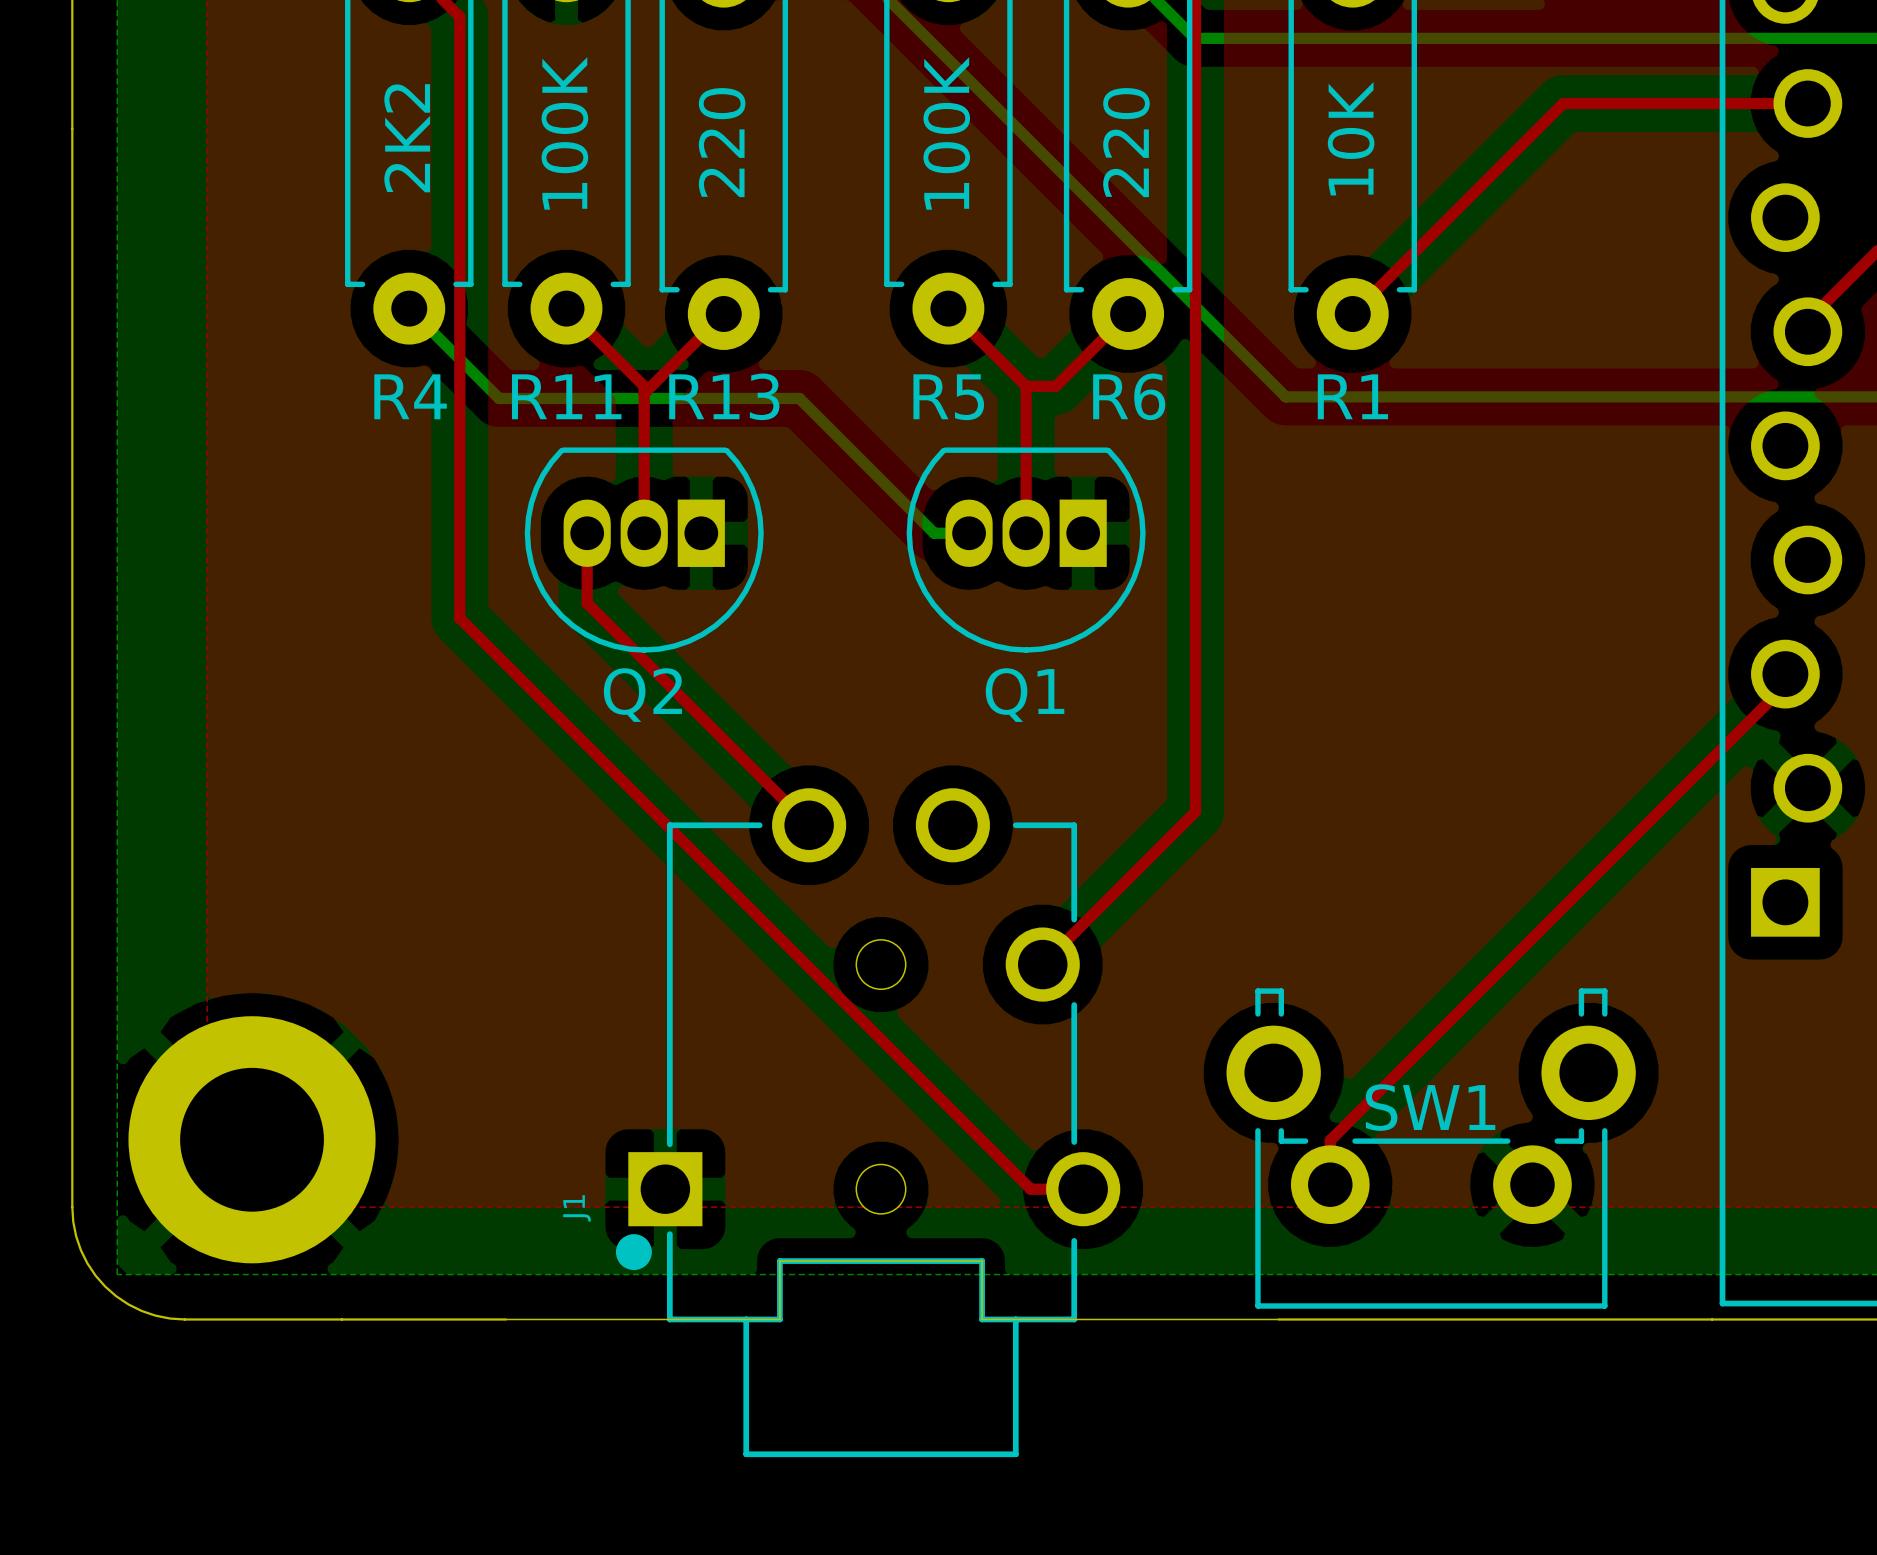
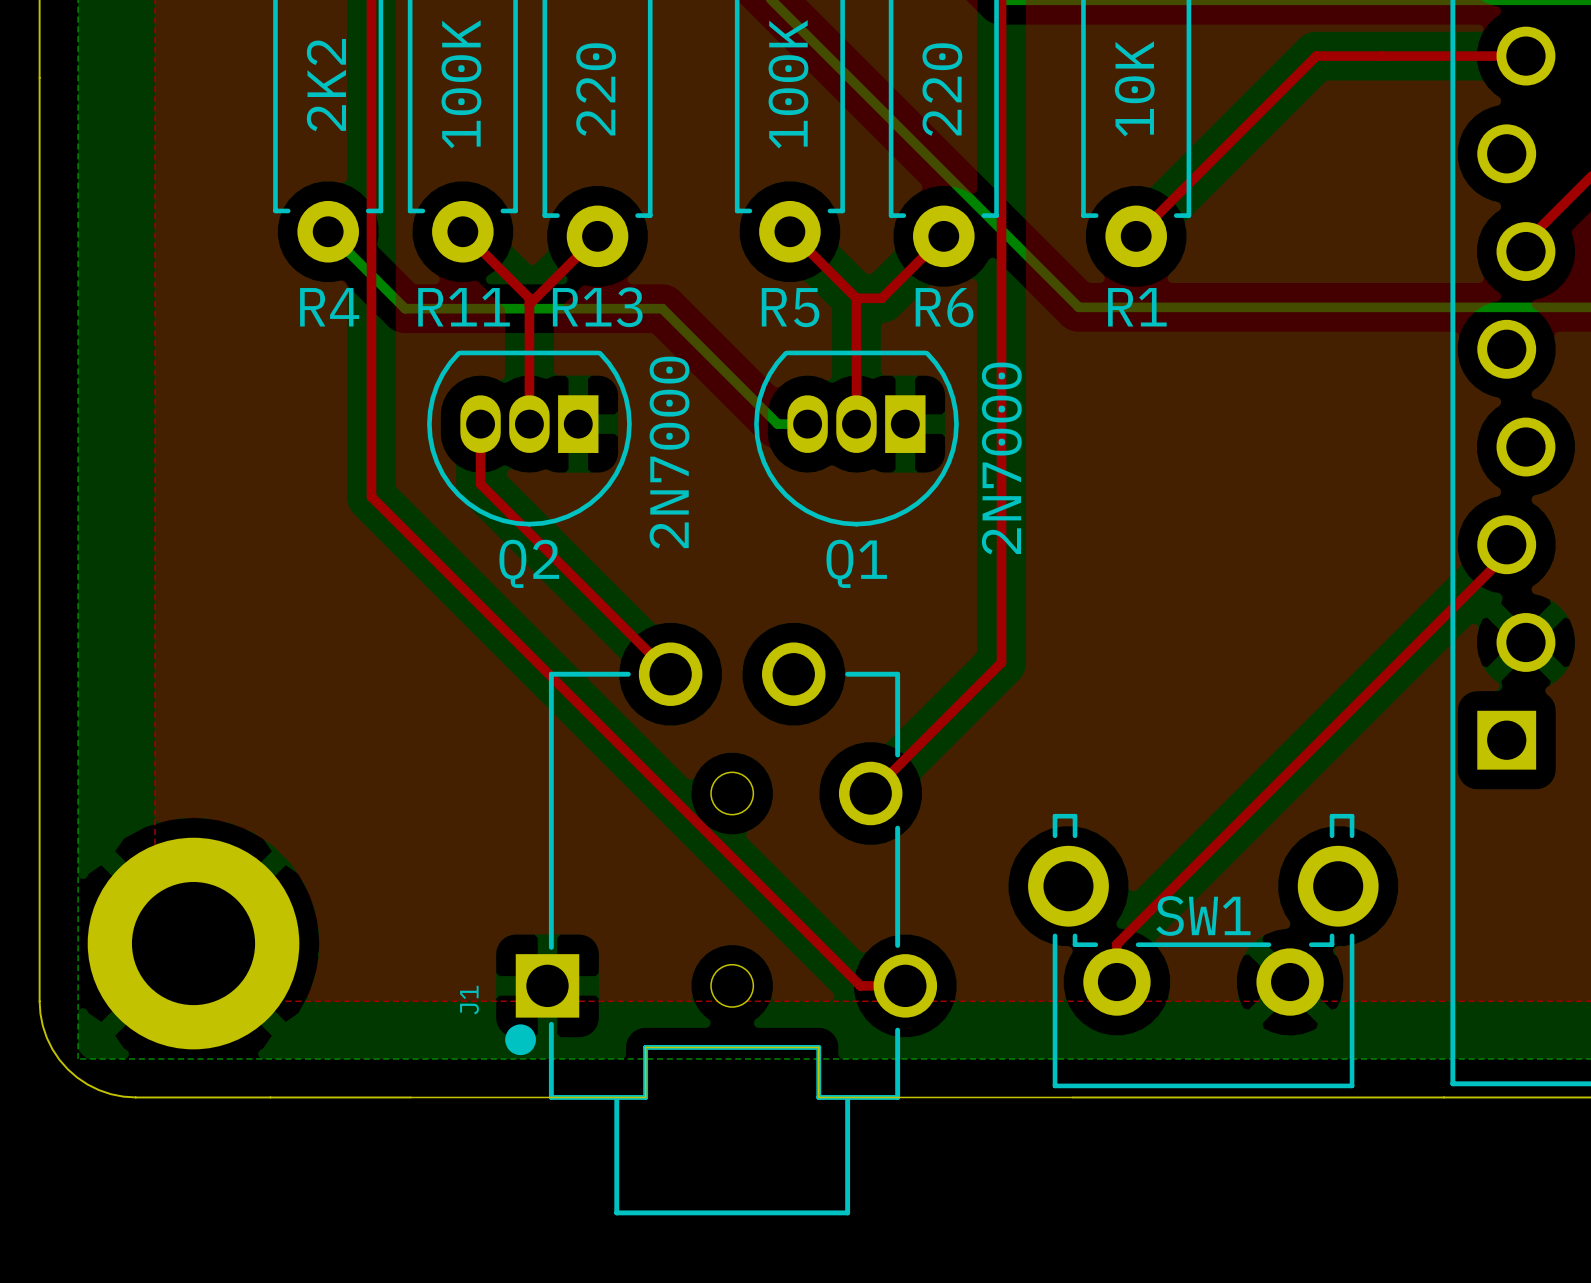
Q2 value: none -> 2N7000 (669, 452)
Q1 value: none -> 2N7000 (1001, 458)

